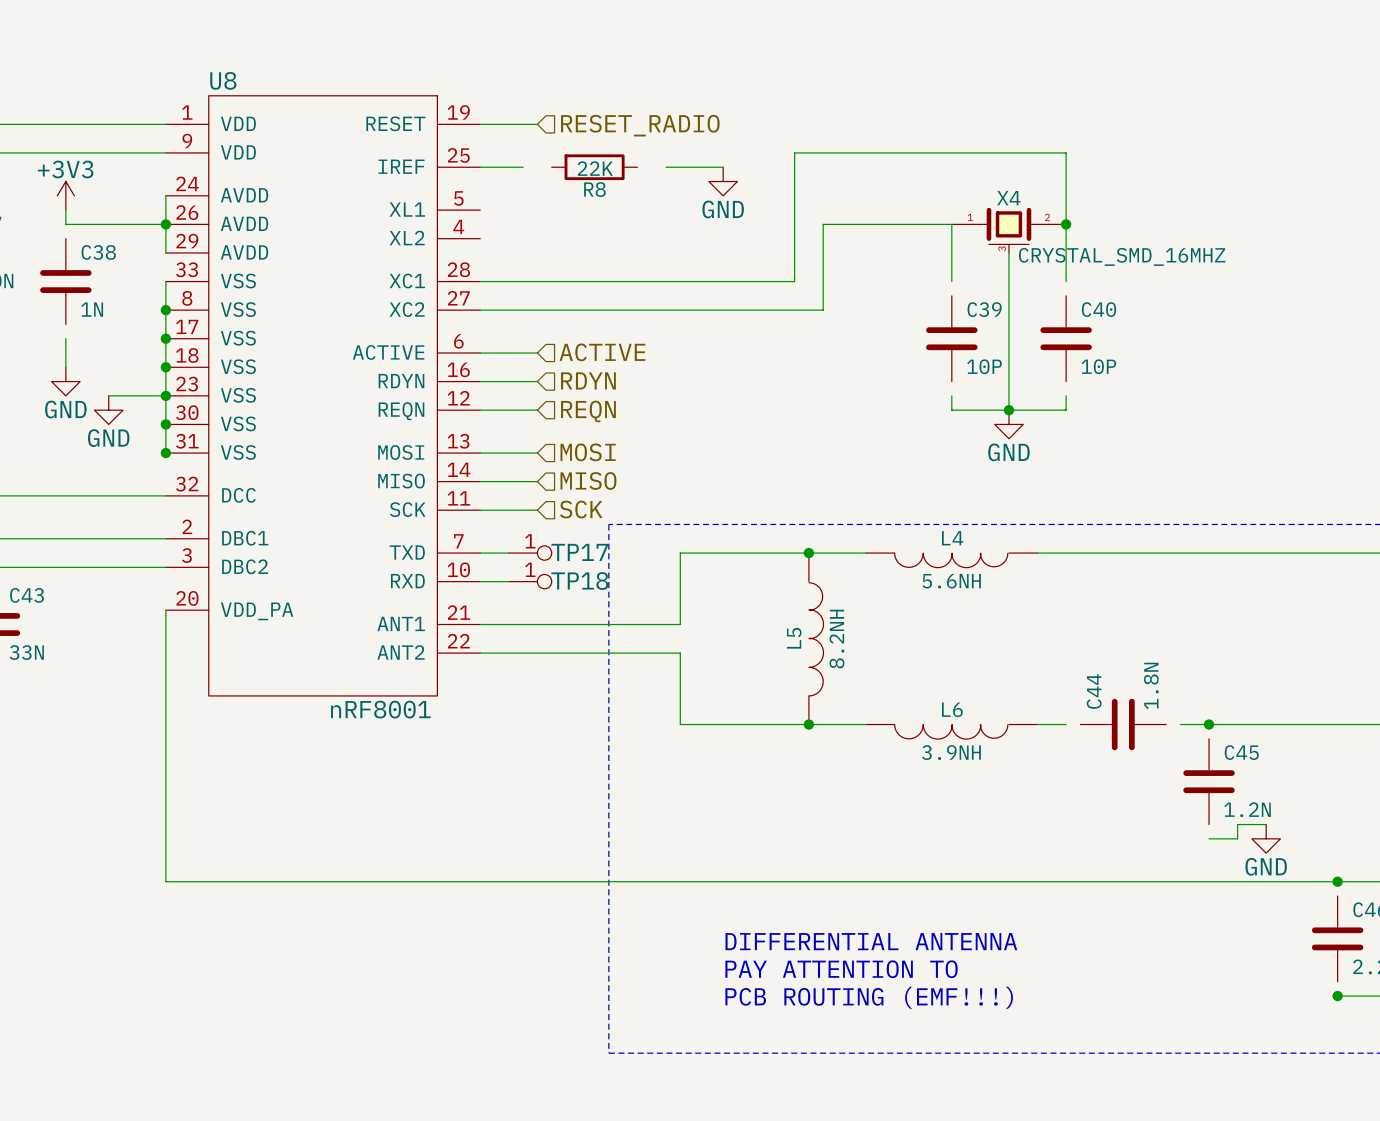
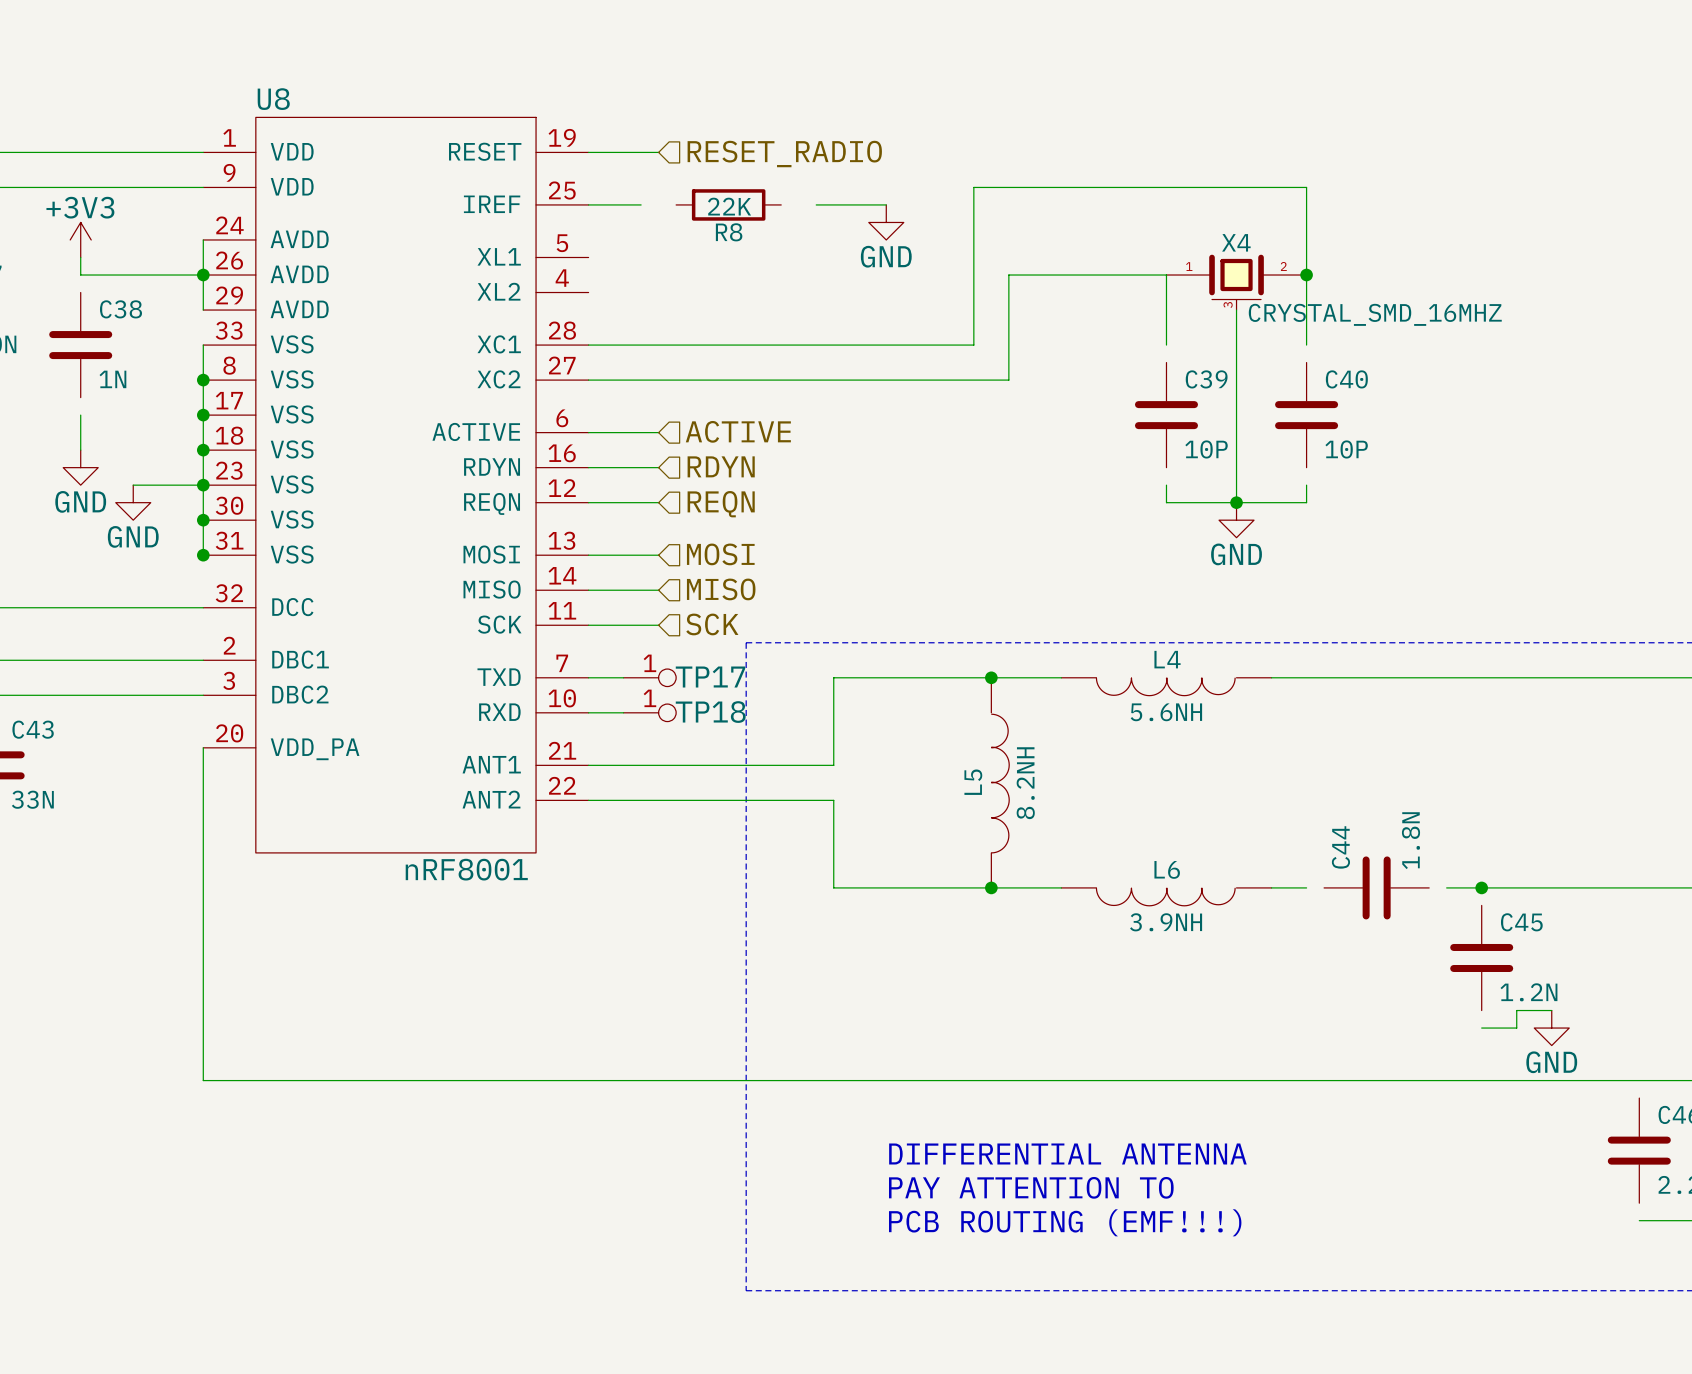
junction: (1337, 881) -> none
junction: (1337, 996) -> none

